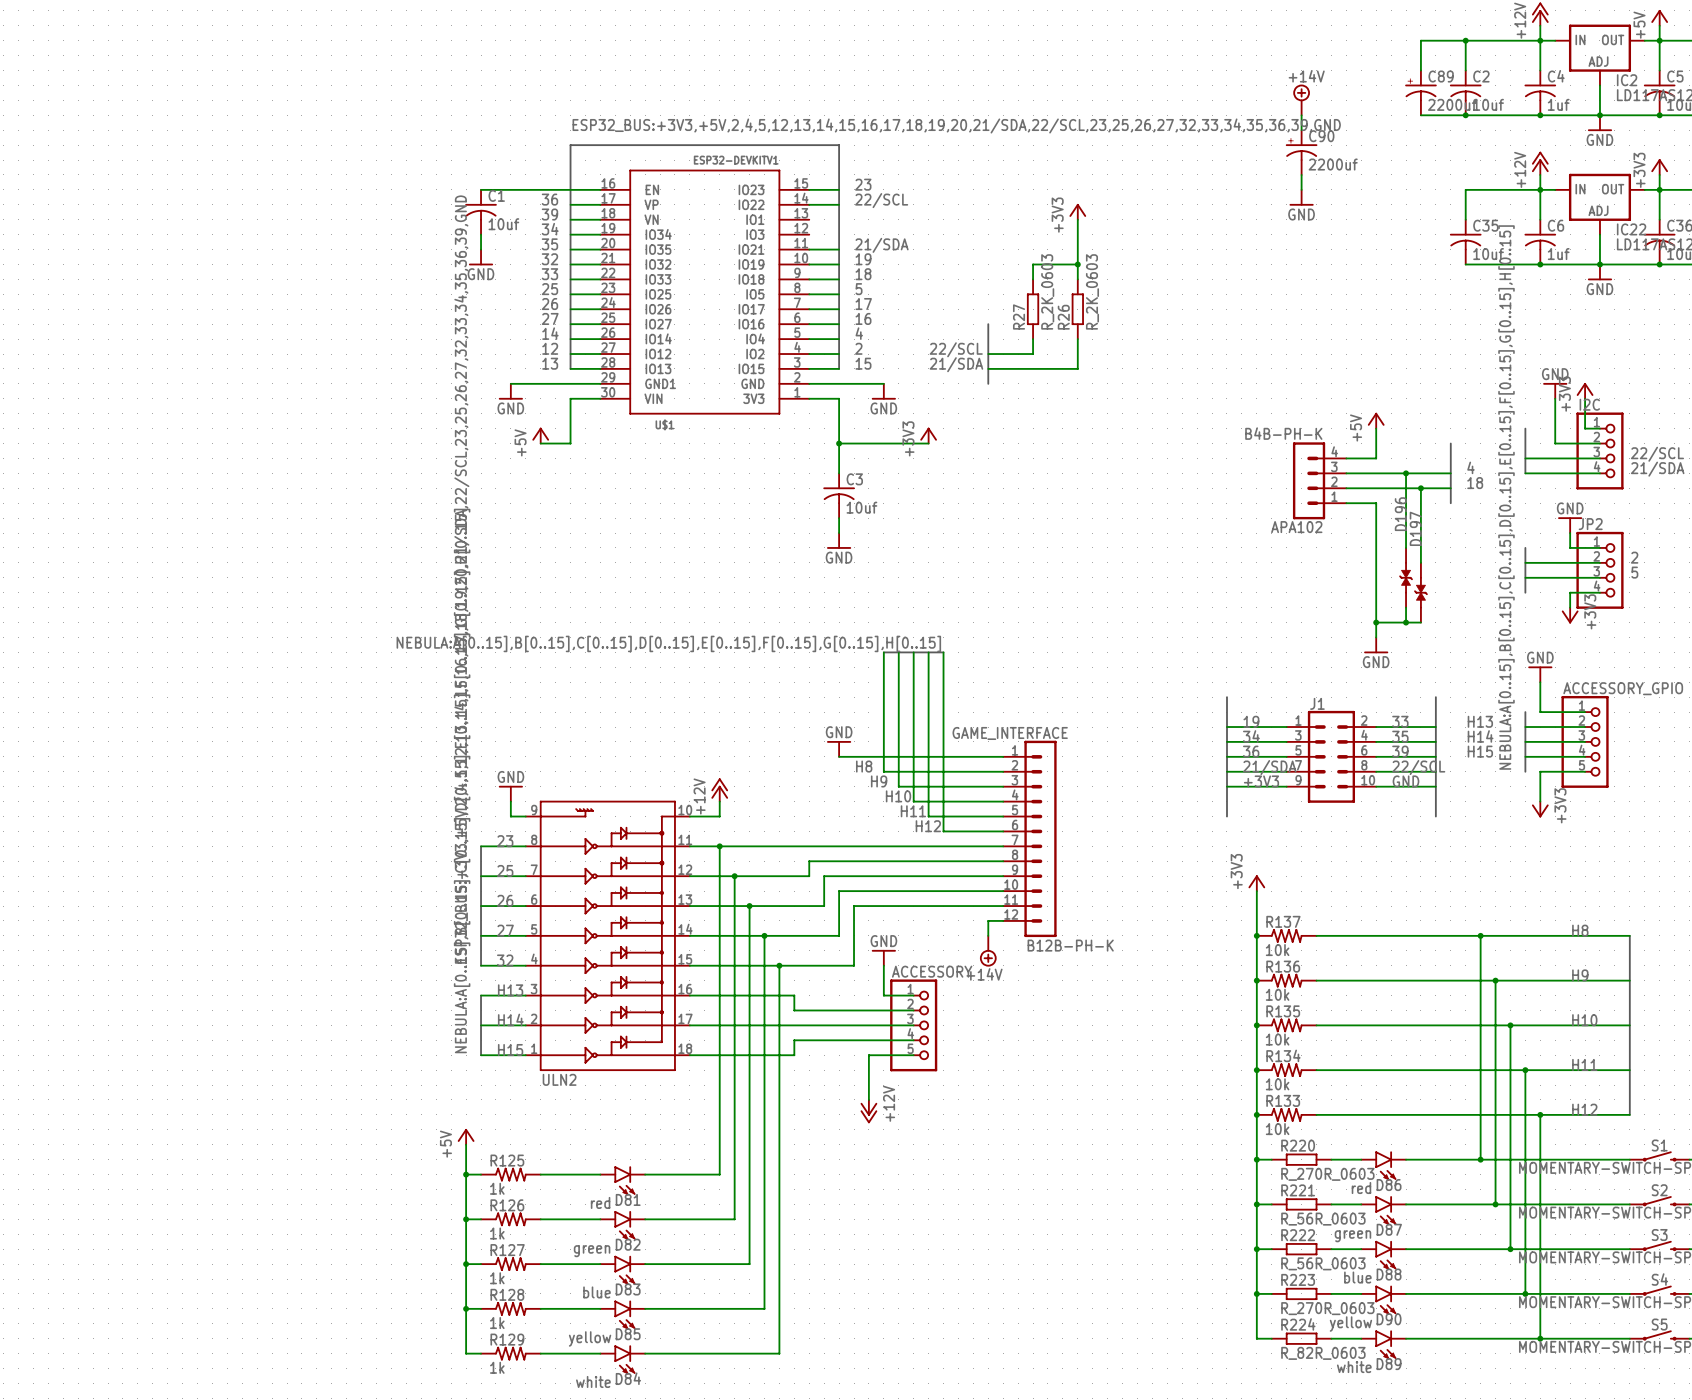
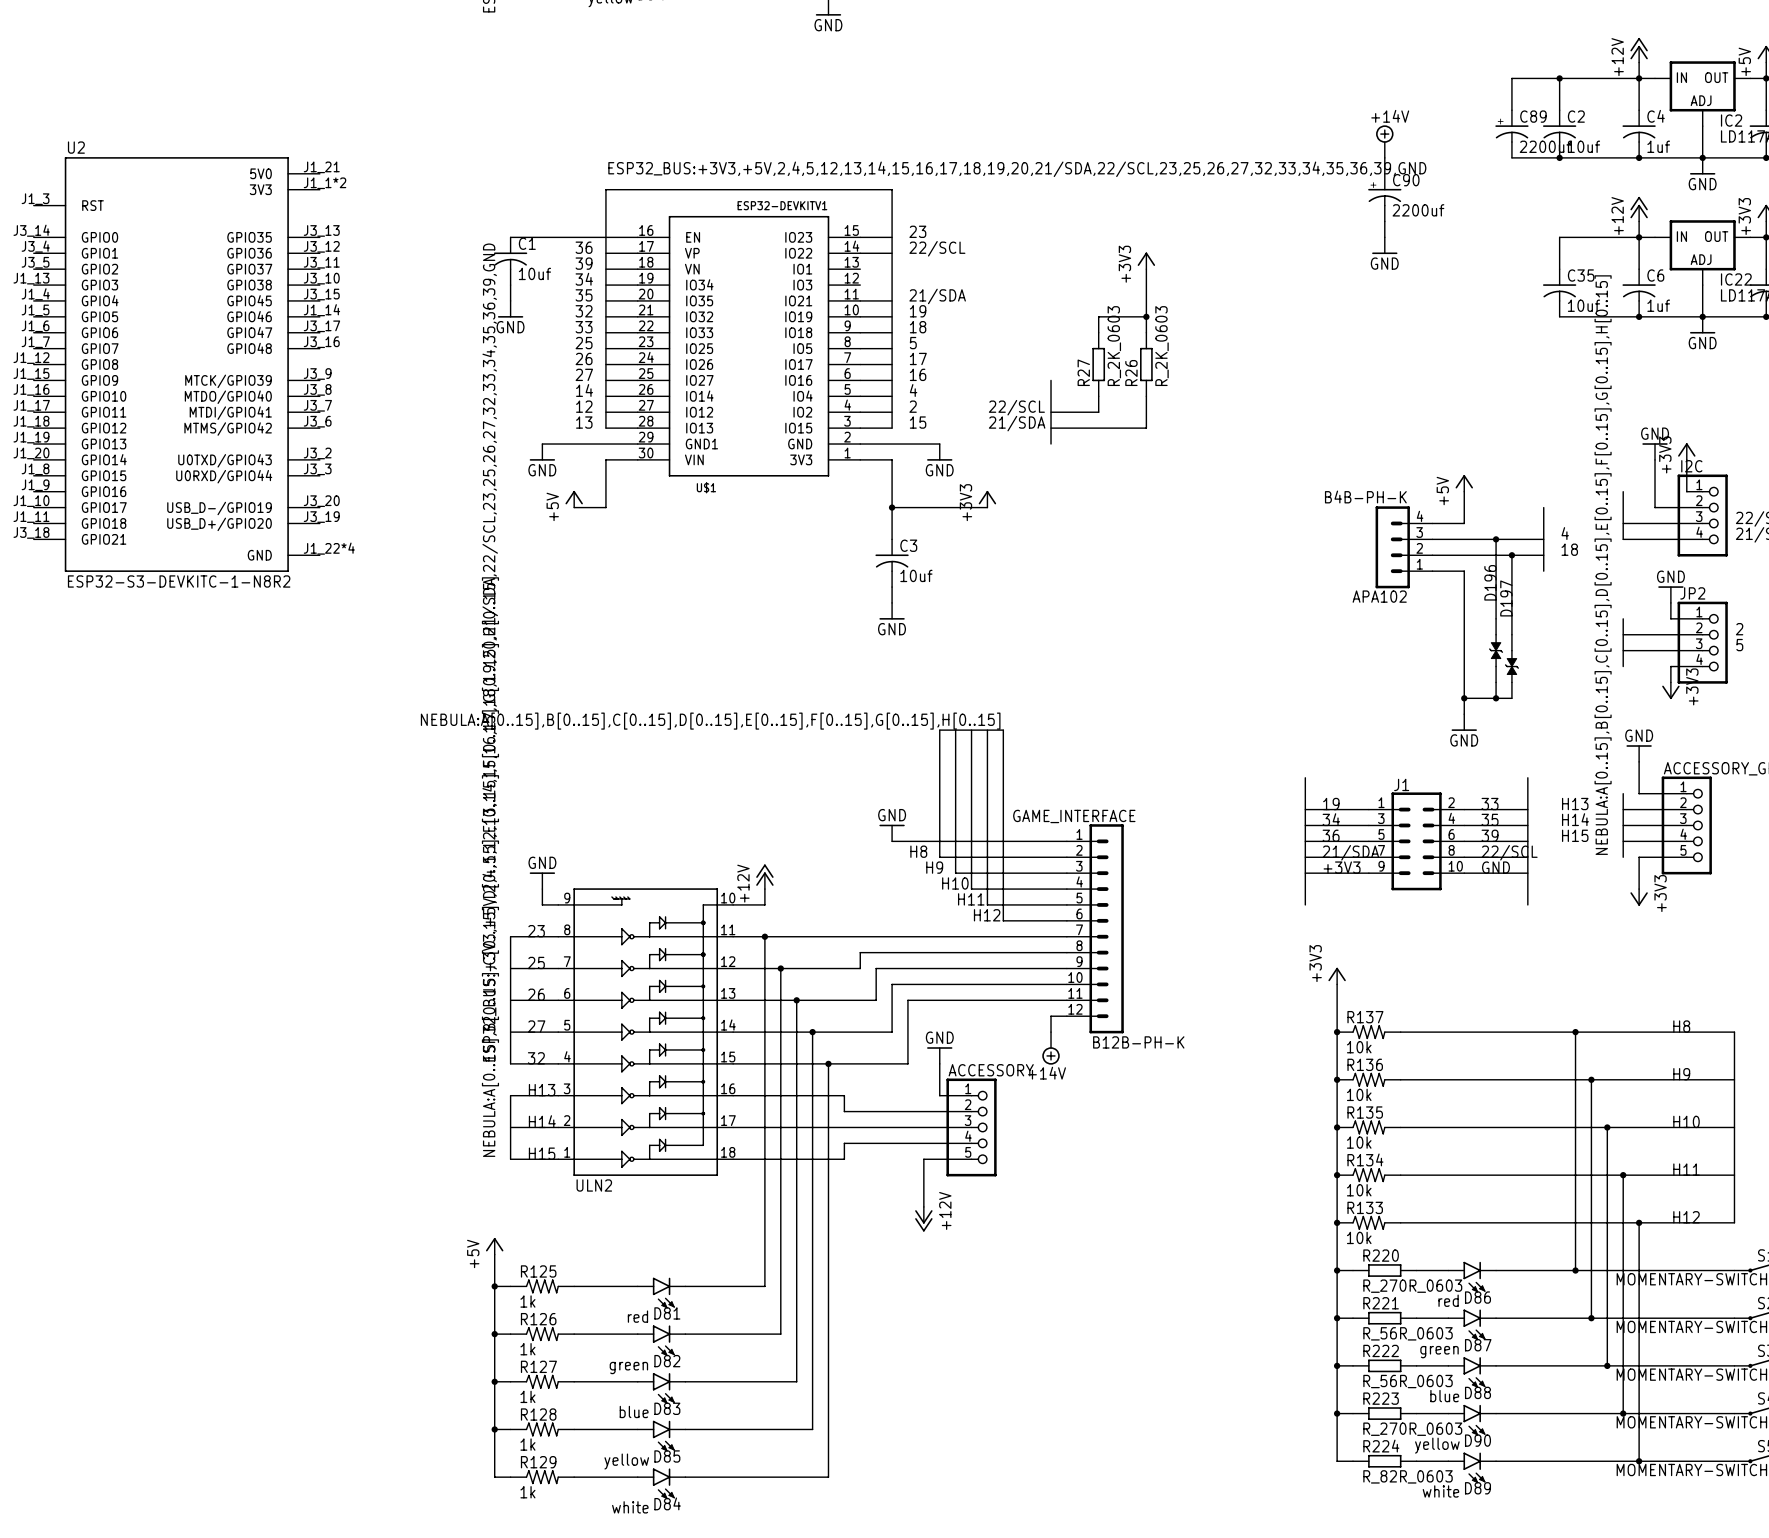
U2: none -> ESP32-S3-DEVKITC-1-N8R2 (176, 364)

